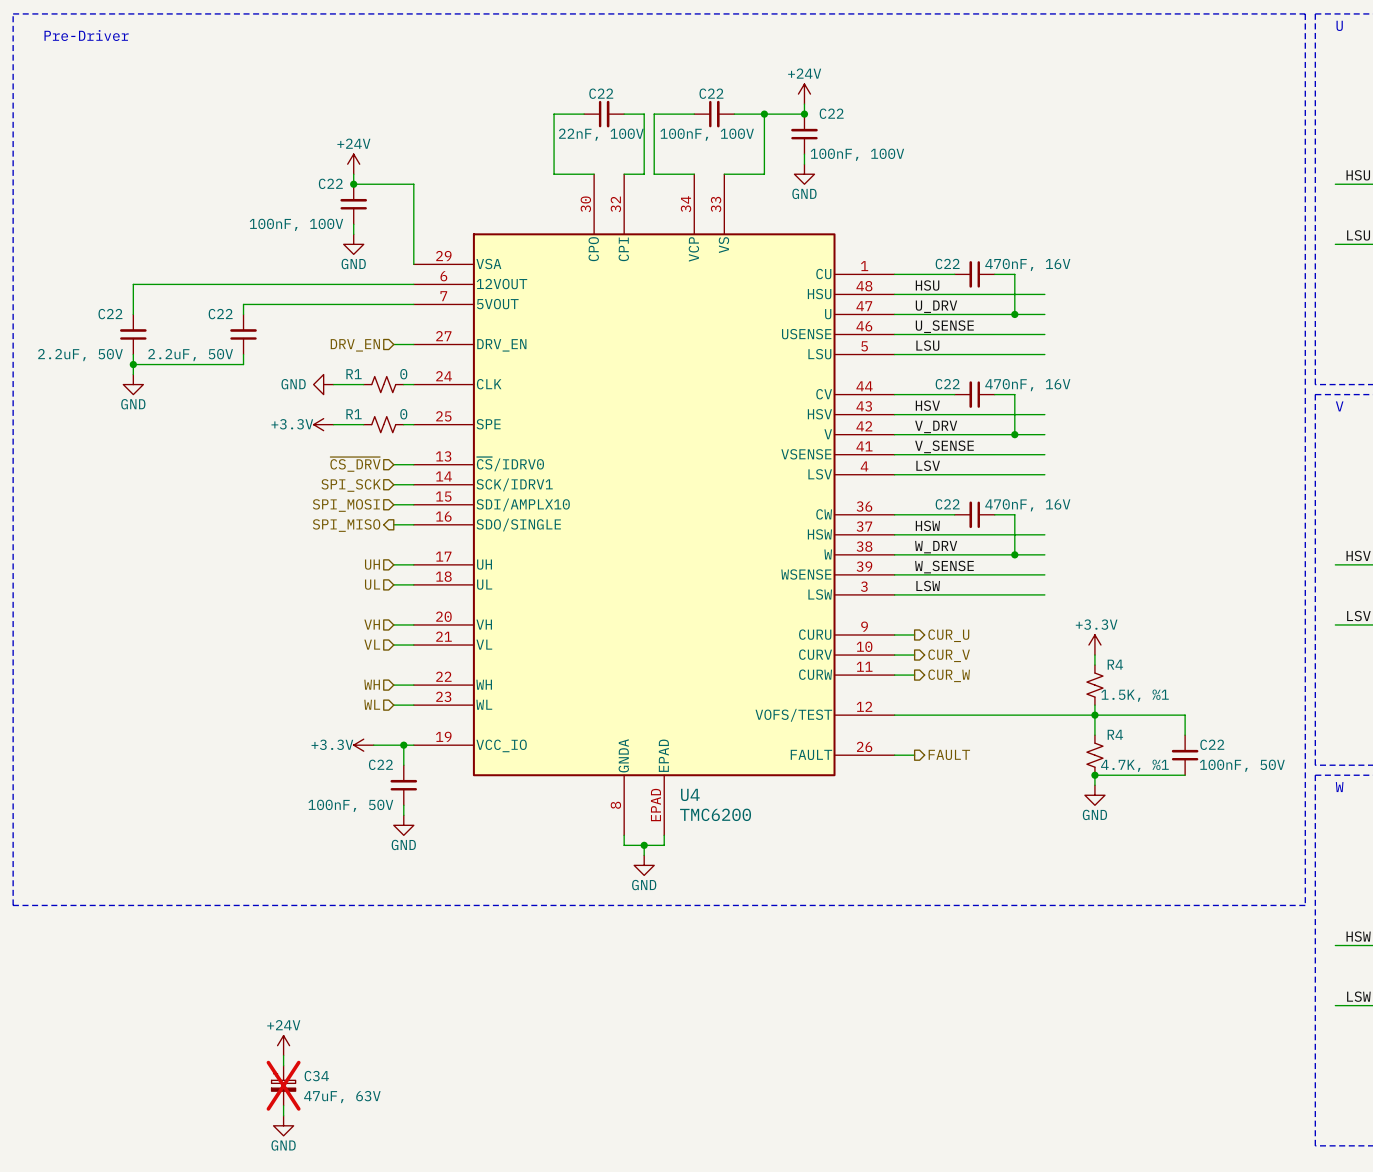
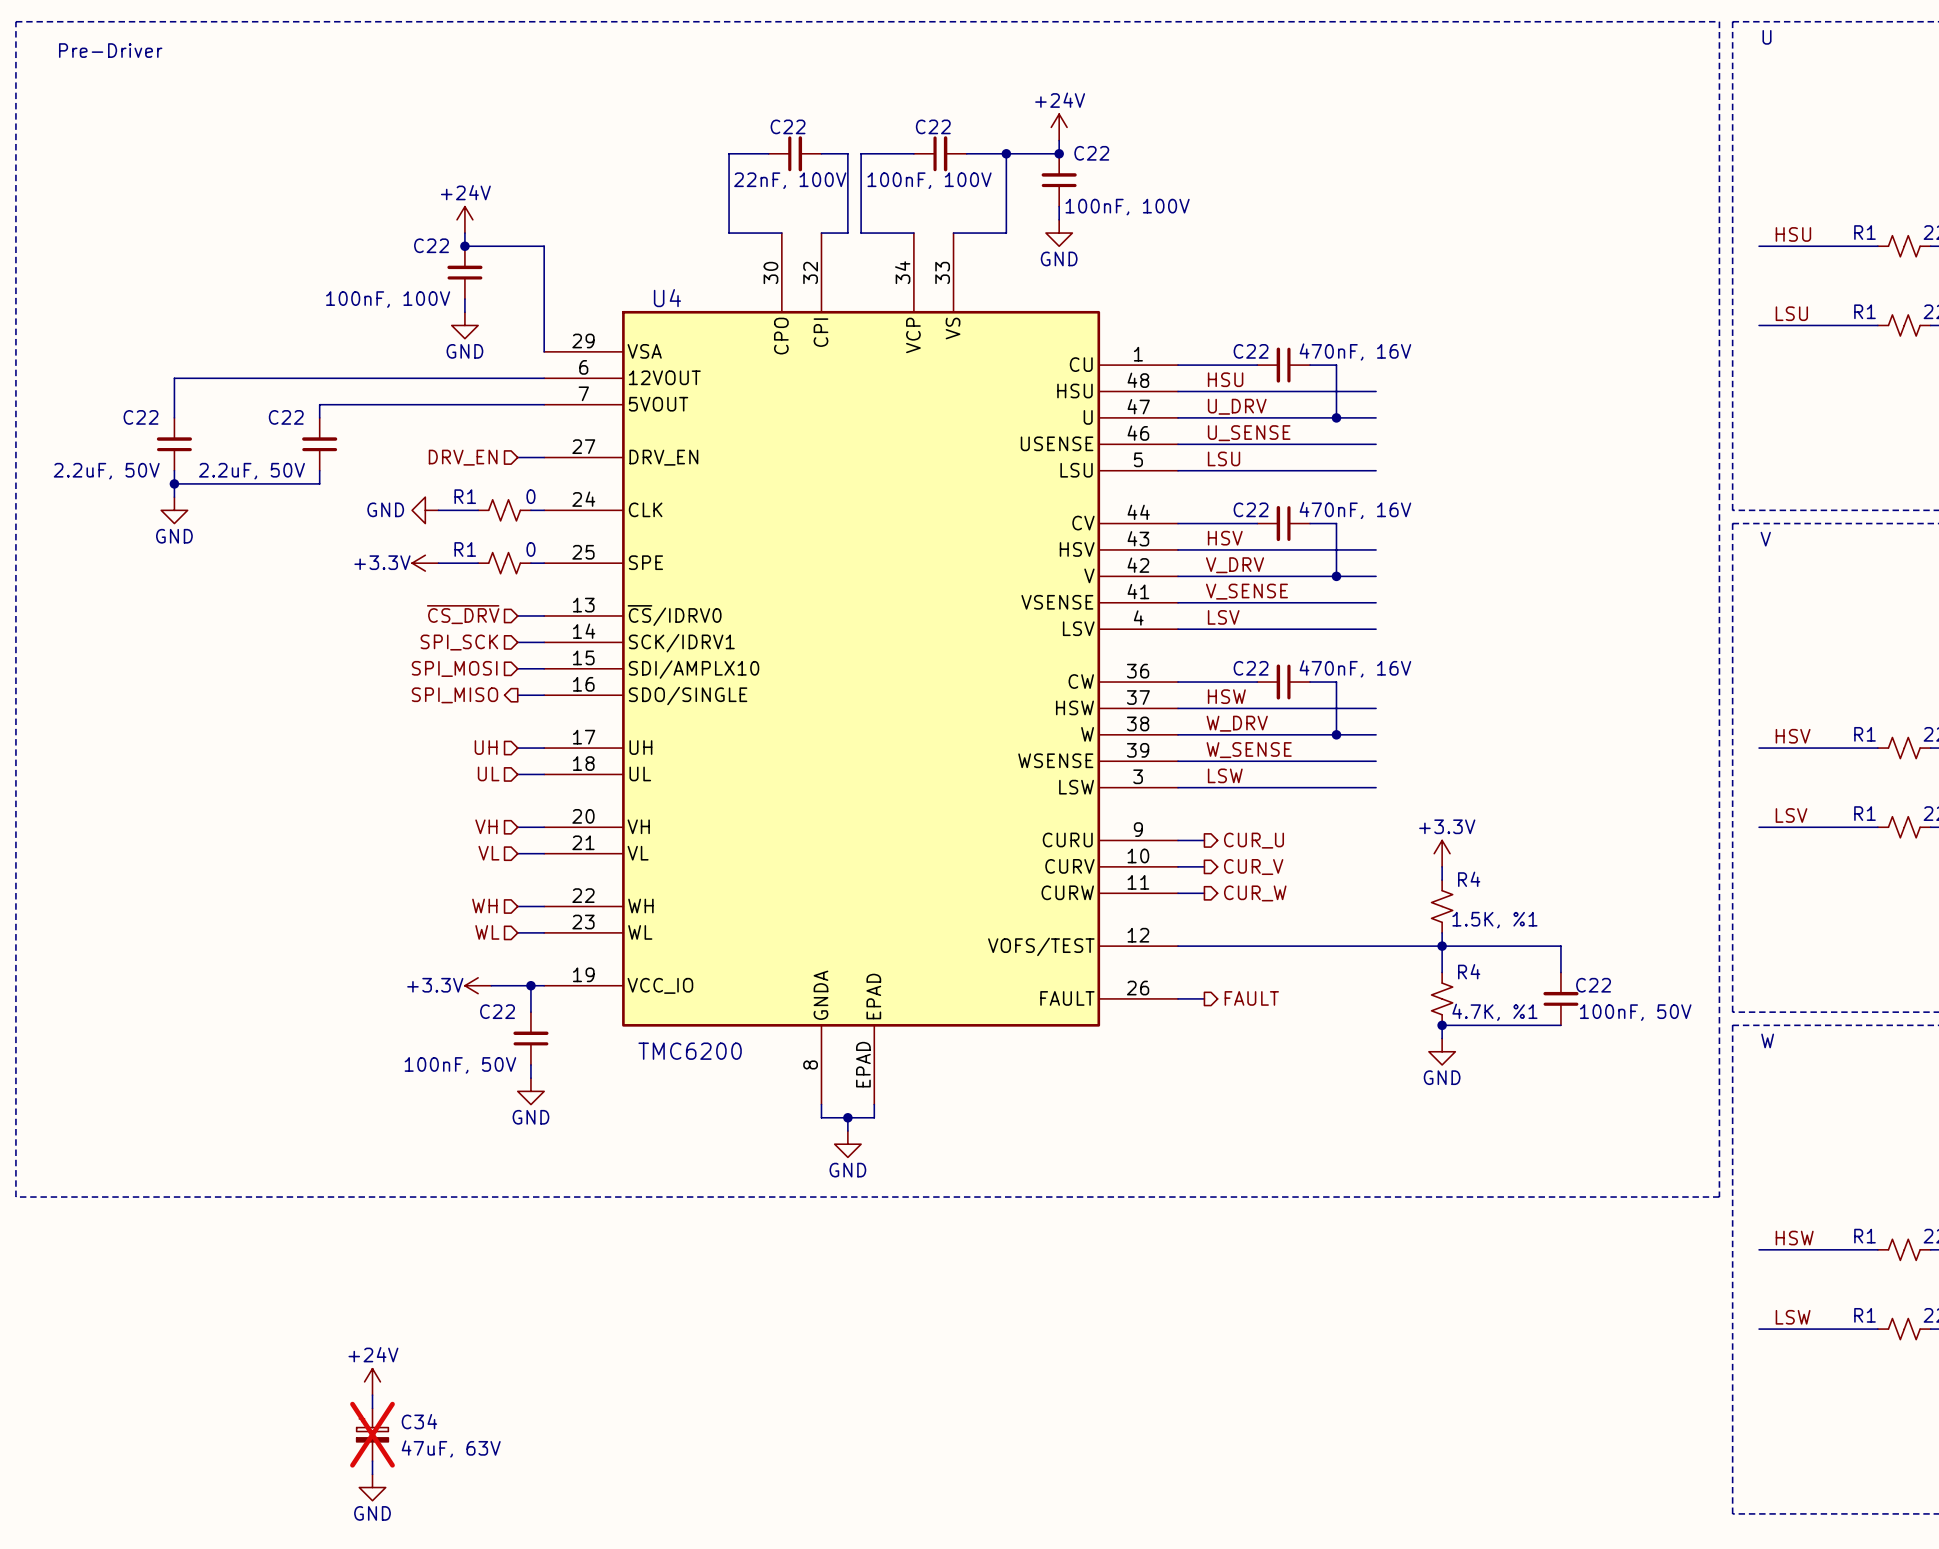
U4 name position: U4 (690, 794) -> U4 (667, 298)
U4 value position: TMC6200 (715, 814) -> TMC6200 (690, 1051)

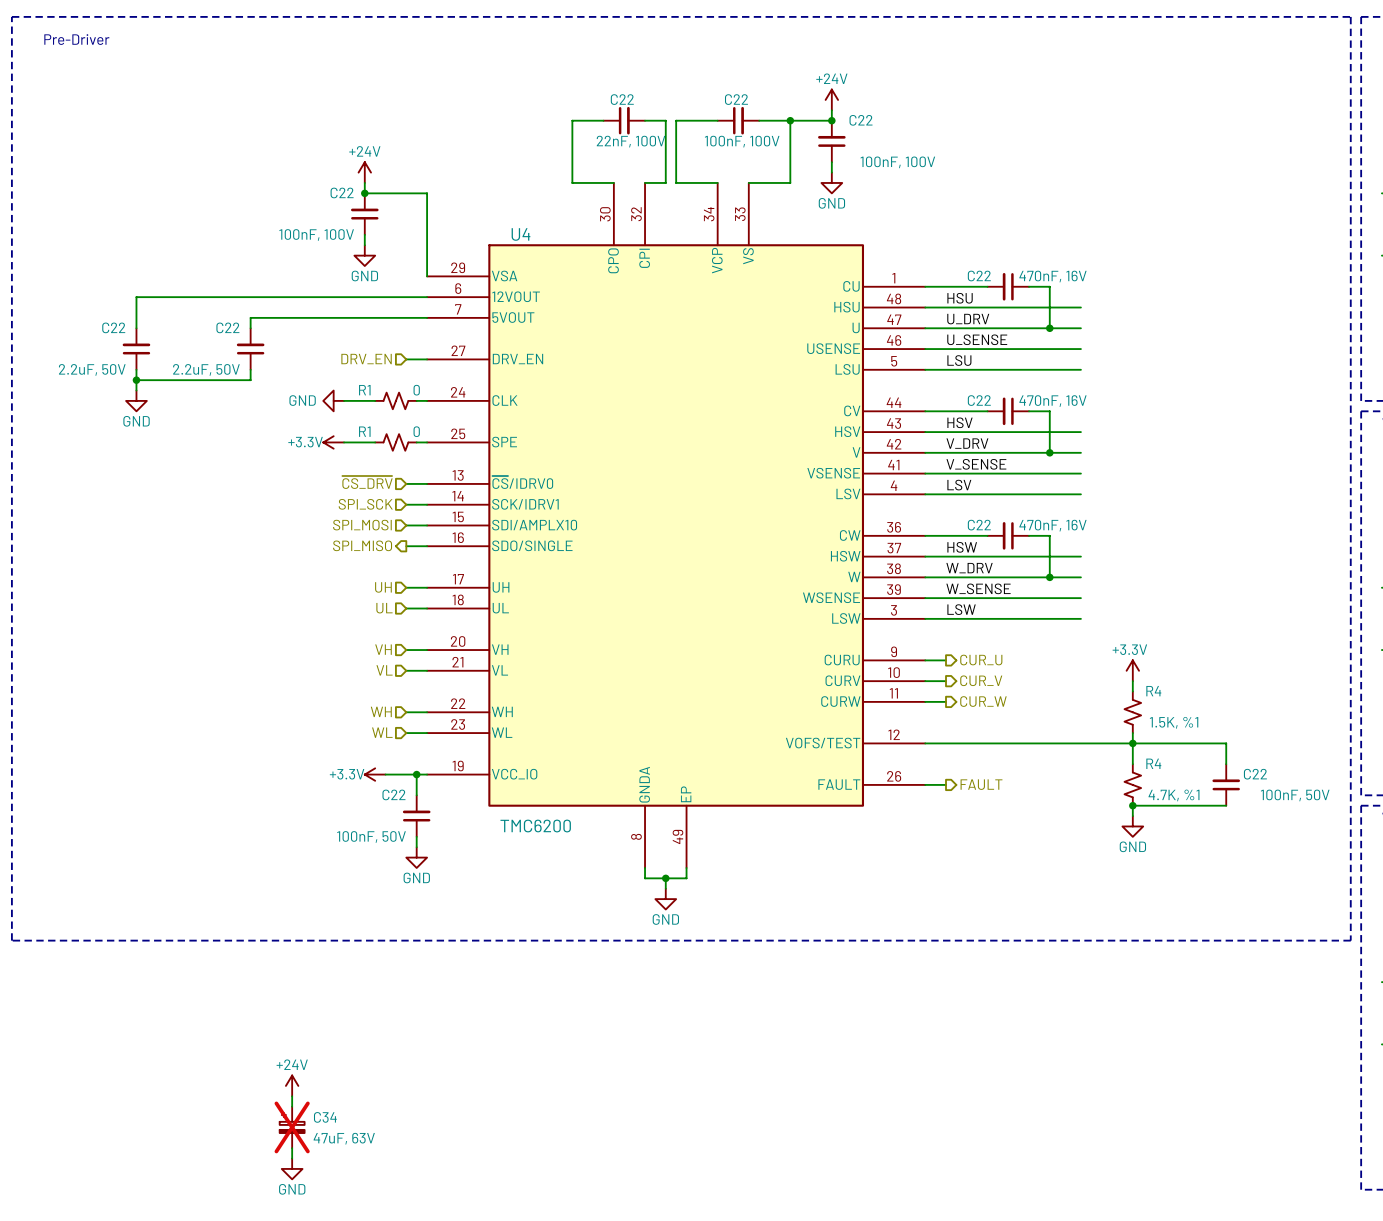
U4 pin name: EPAD (873, 996) -> EP (686, 794)
U4 pin number: EPAD (863, 1064) -> 49 (677, 836)

